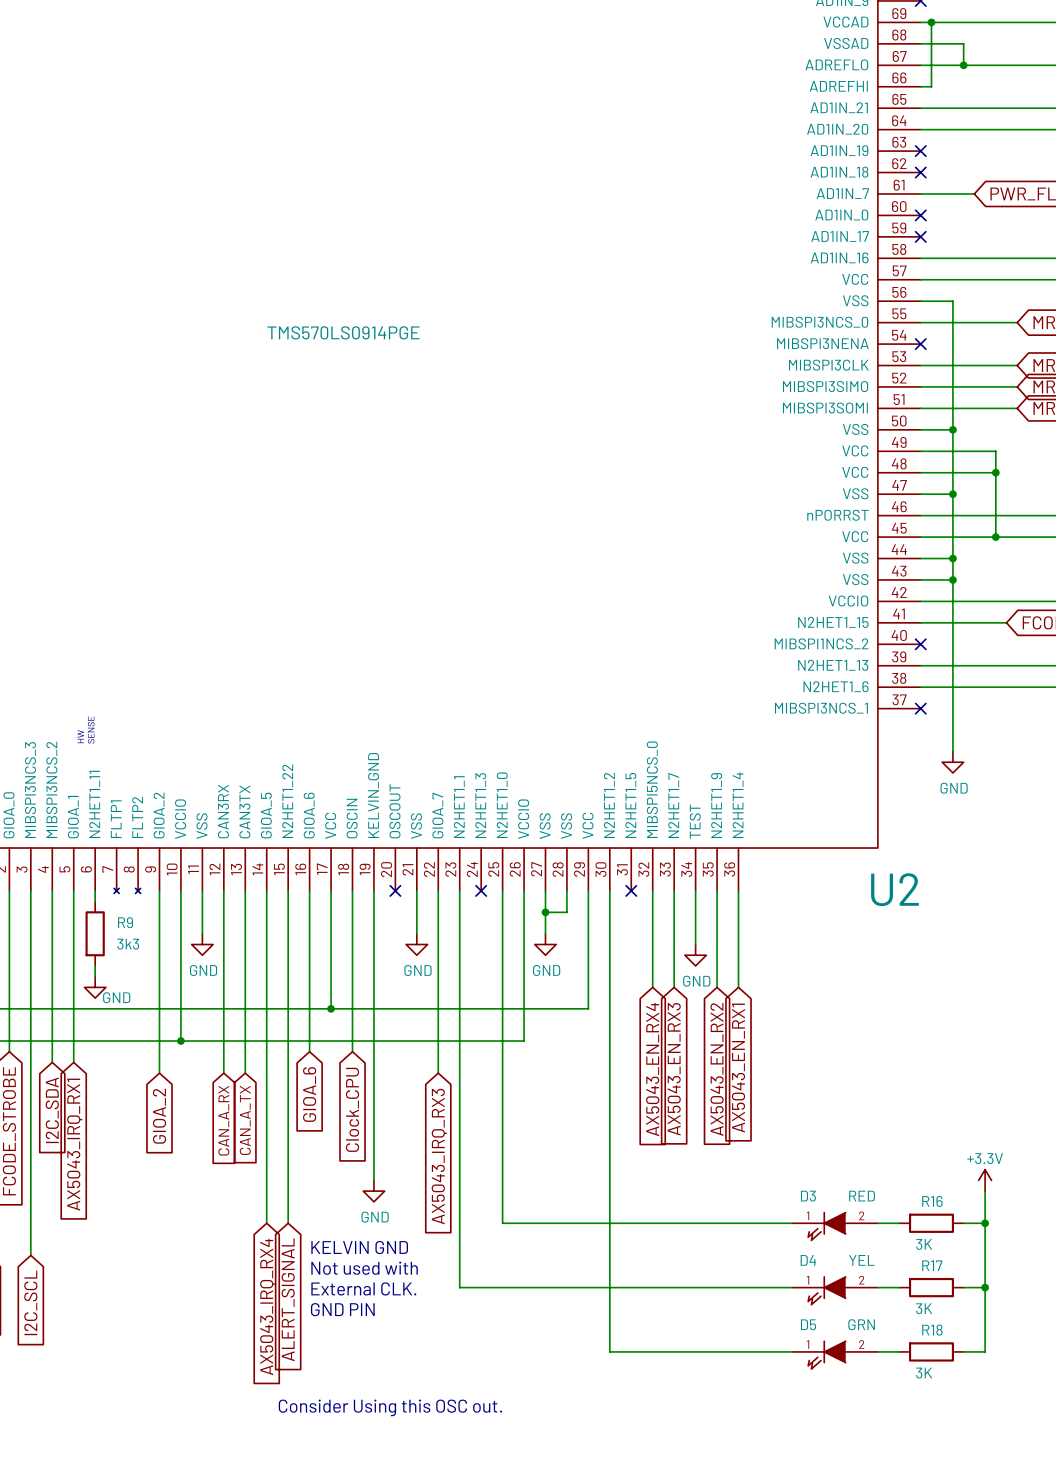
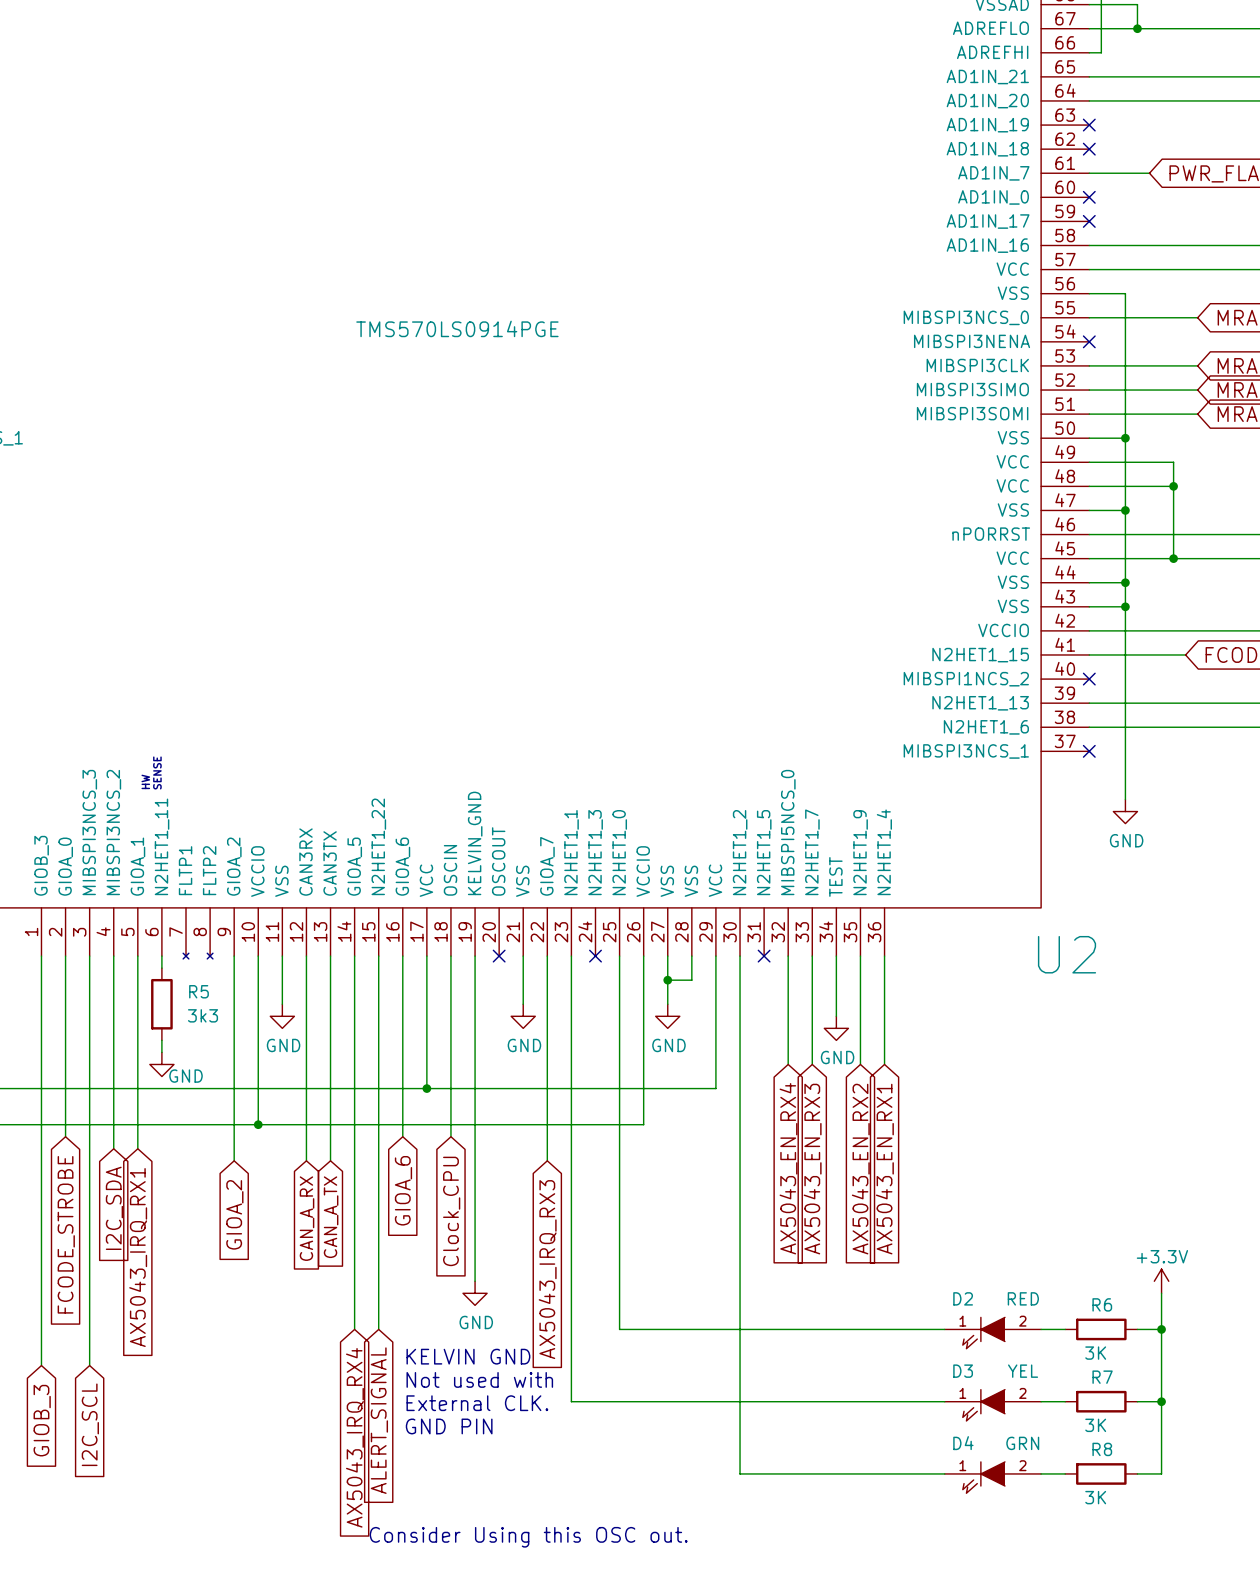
R9 name: R9 (125, 922) -> R5 (198, 991)
D3 name: D3 (808, 1196) -> D2 (963, 1298)
R16 name: R16 (932, 1201) -> R6 (1102, 1304)
D4 name: D4 (808, 1260) -> D3 (963, 1371)
R17 name: R17 (932, 1265) -> R7 (1102, 1377)
D5 name: D5 (808, 1324) -> D4 (963, 1443)
R18 name: R18 (932, 1330) -> R8 (1102, 1449)

